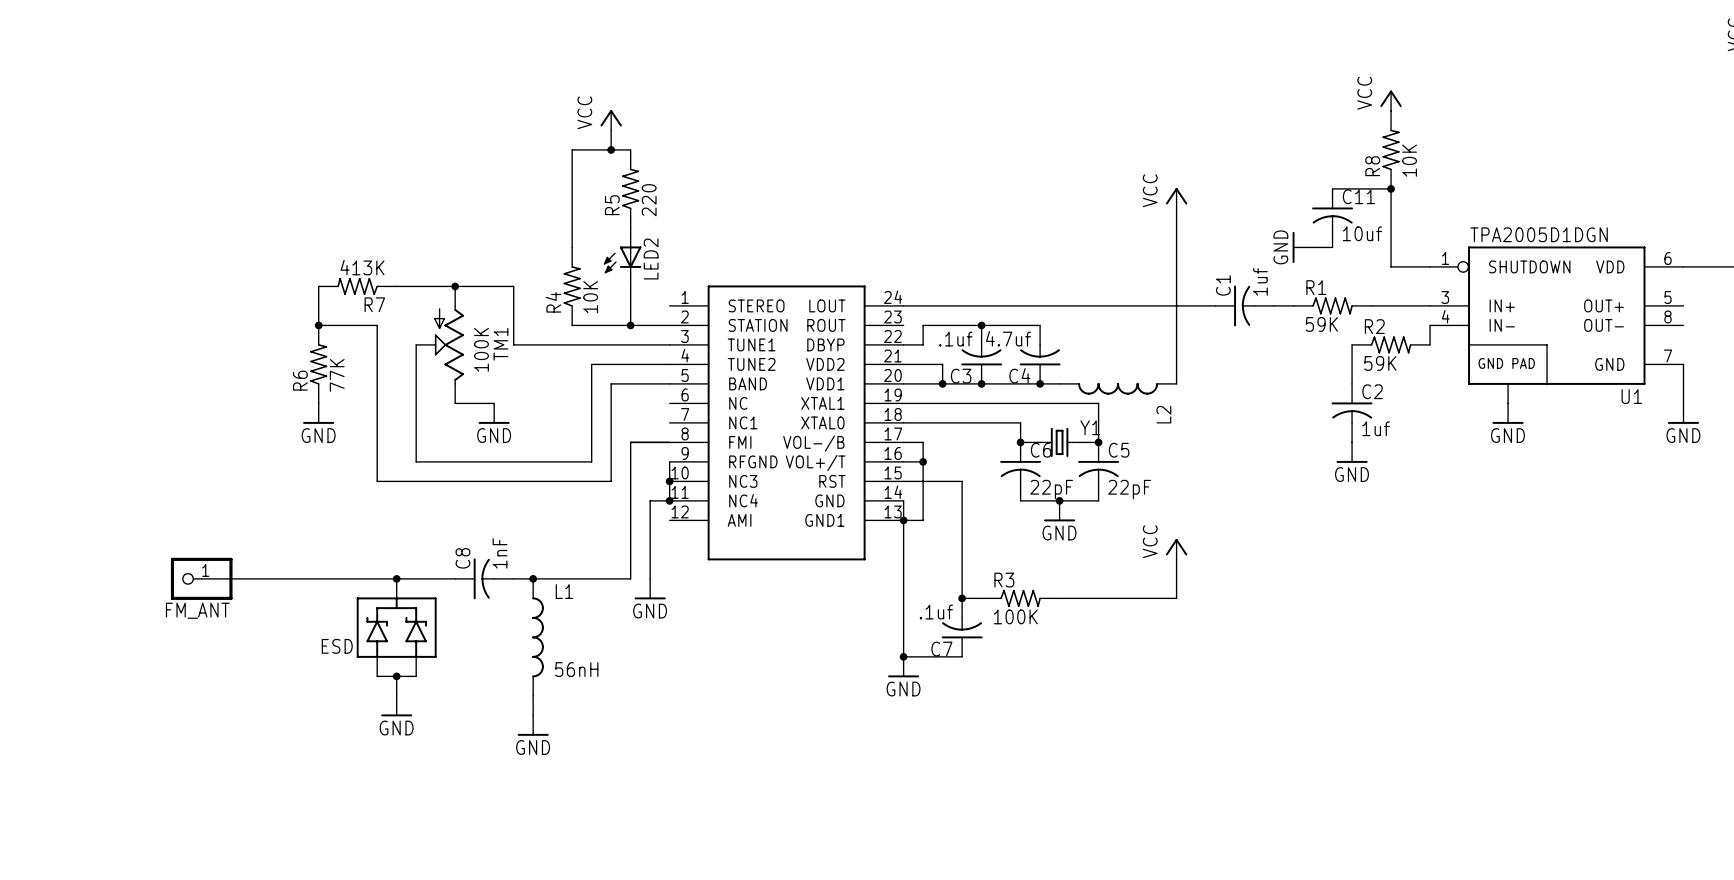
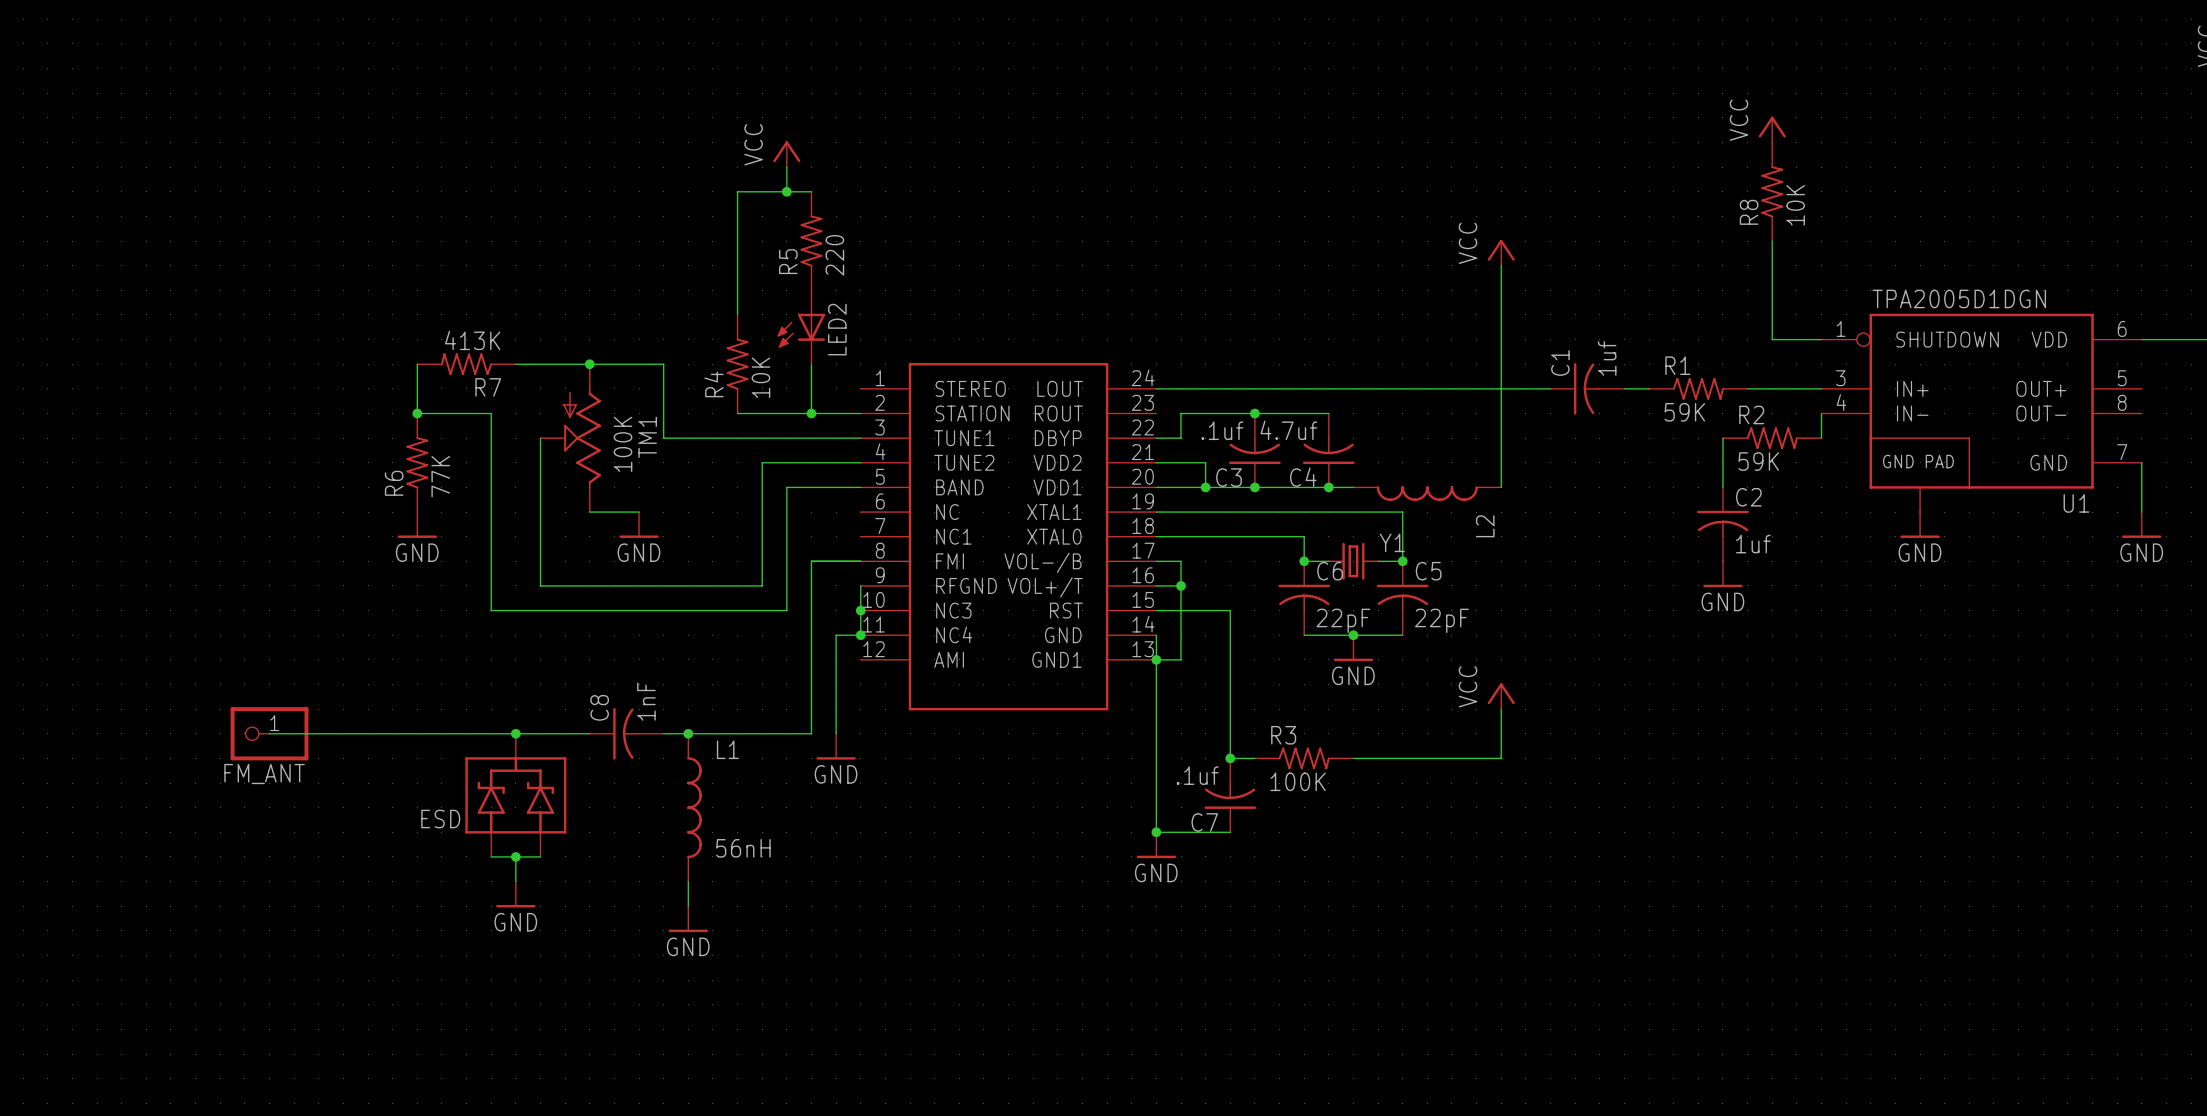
wire: (1332, 188) (1391, 188) -> none
junction: (1391, 188) -> none
C11: 10uf (1332, 218) -> none
power symbol: GND (1302, 247) -> none
wire: (1313, 247) (1332, 247) -> none

